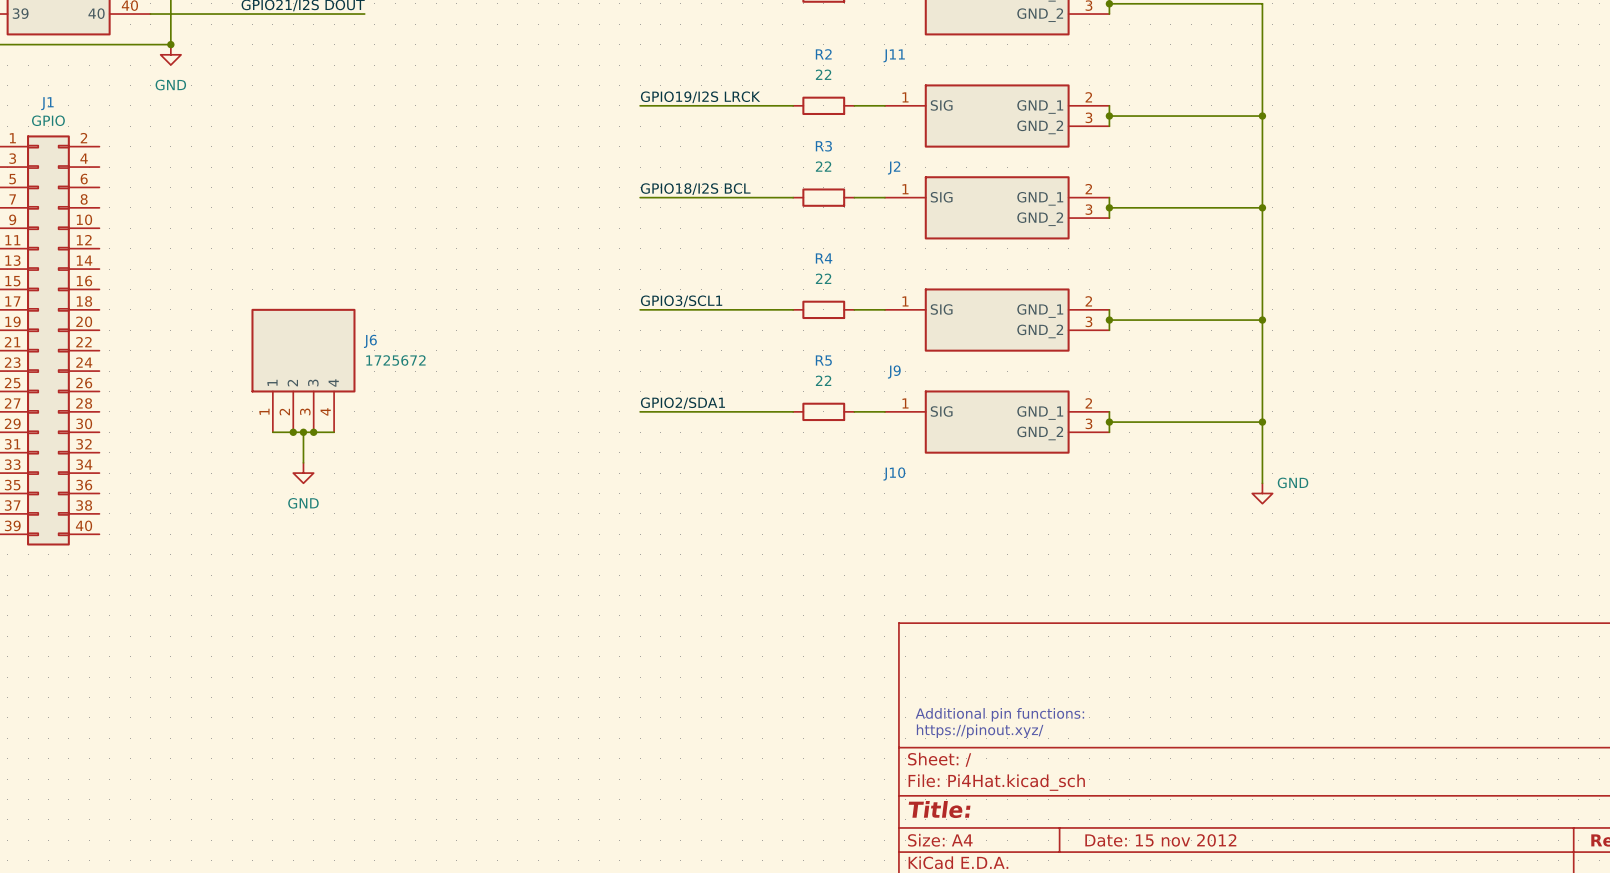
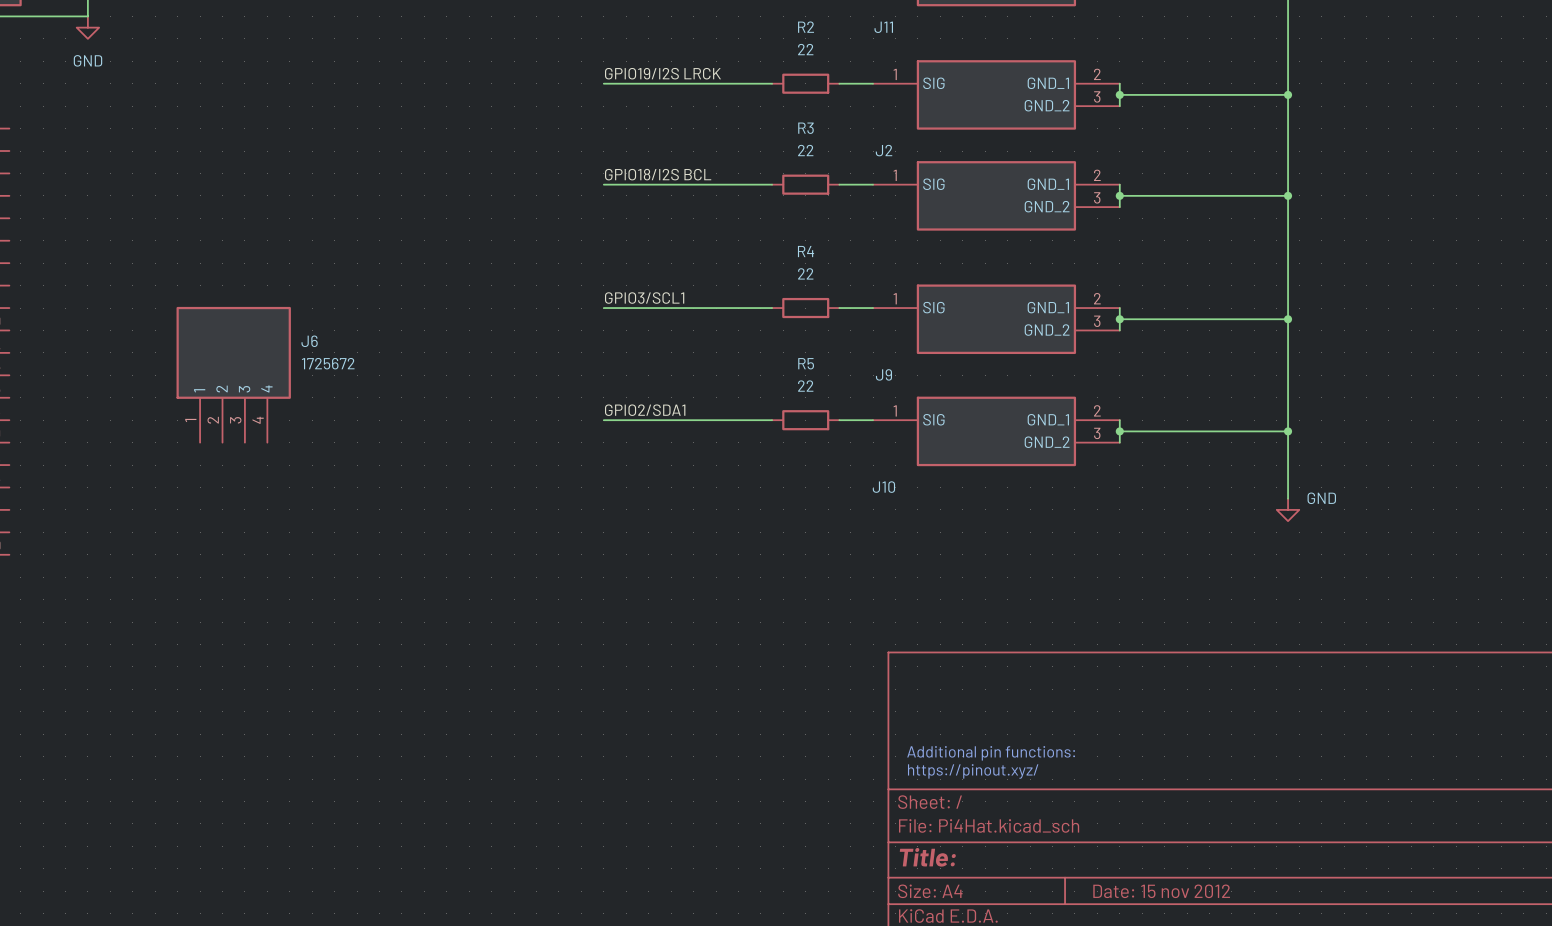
junction: (170, 44) -> none
wire: (272, 432) (334, 432) -> none
junction: (293, 432) -> none
wire: (303, 432) (303, 462) -> none
junction: (303, 432) -> none
junction: (313, 432) -> none
power symbol: GND (303, 473) -> none

